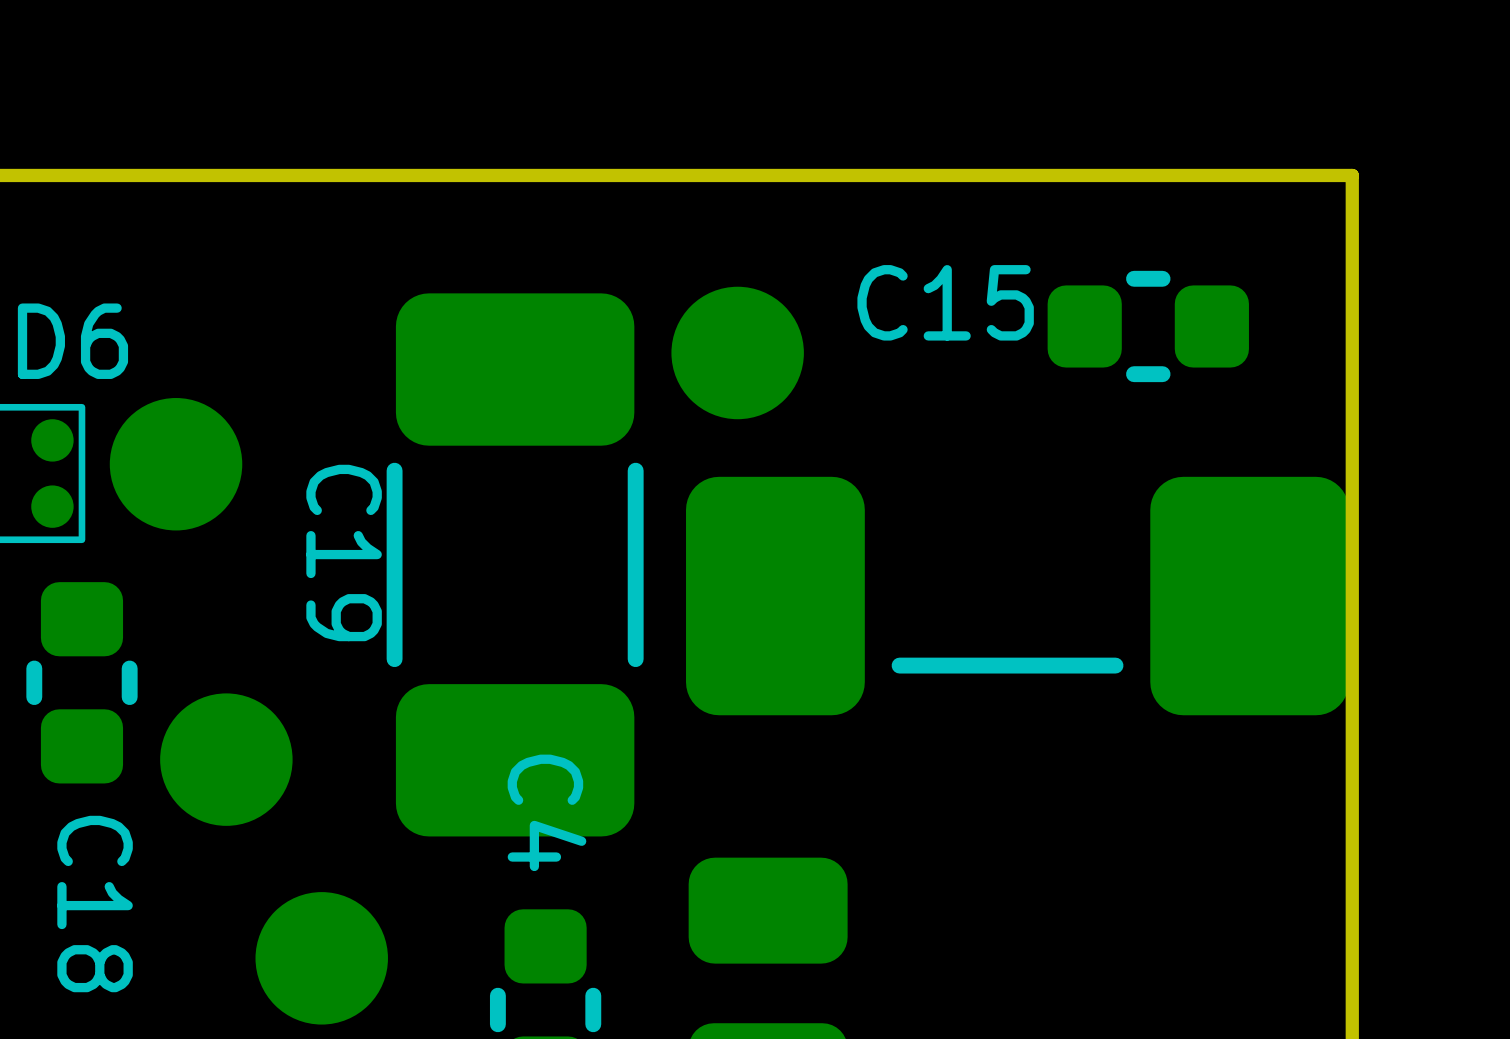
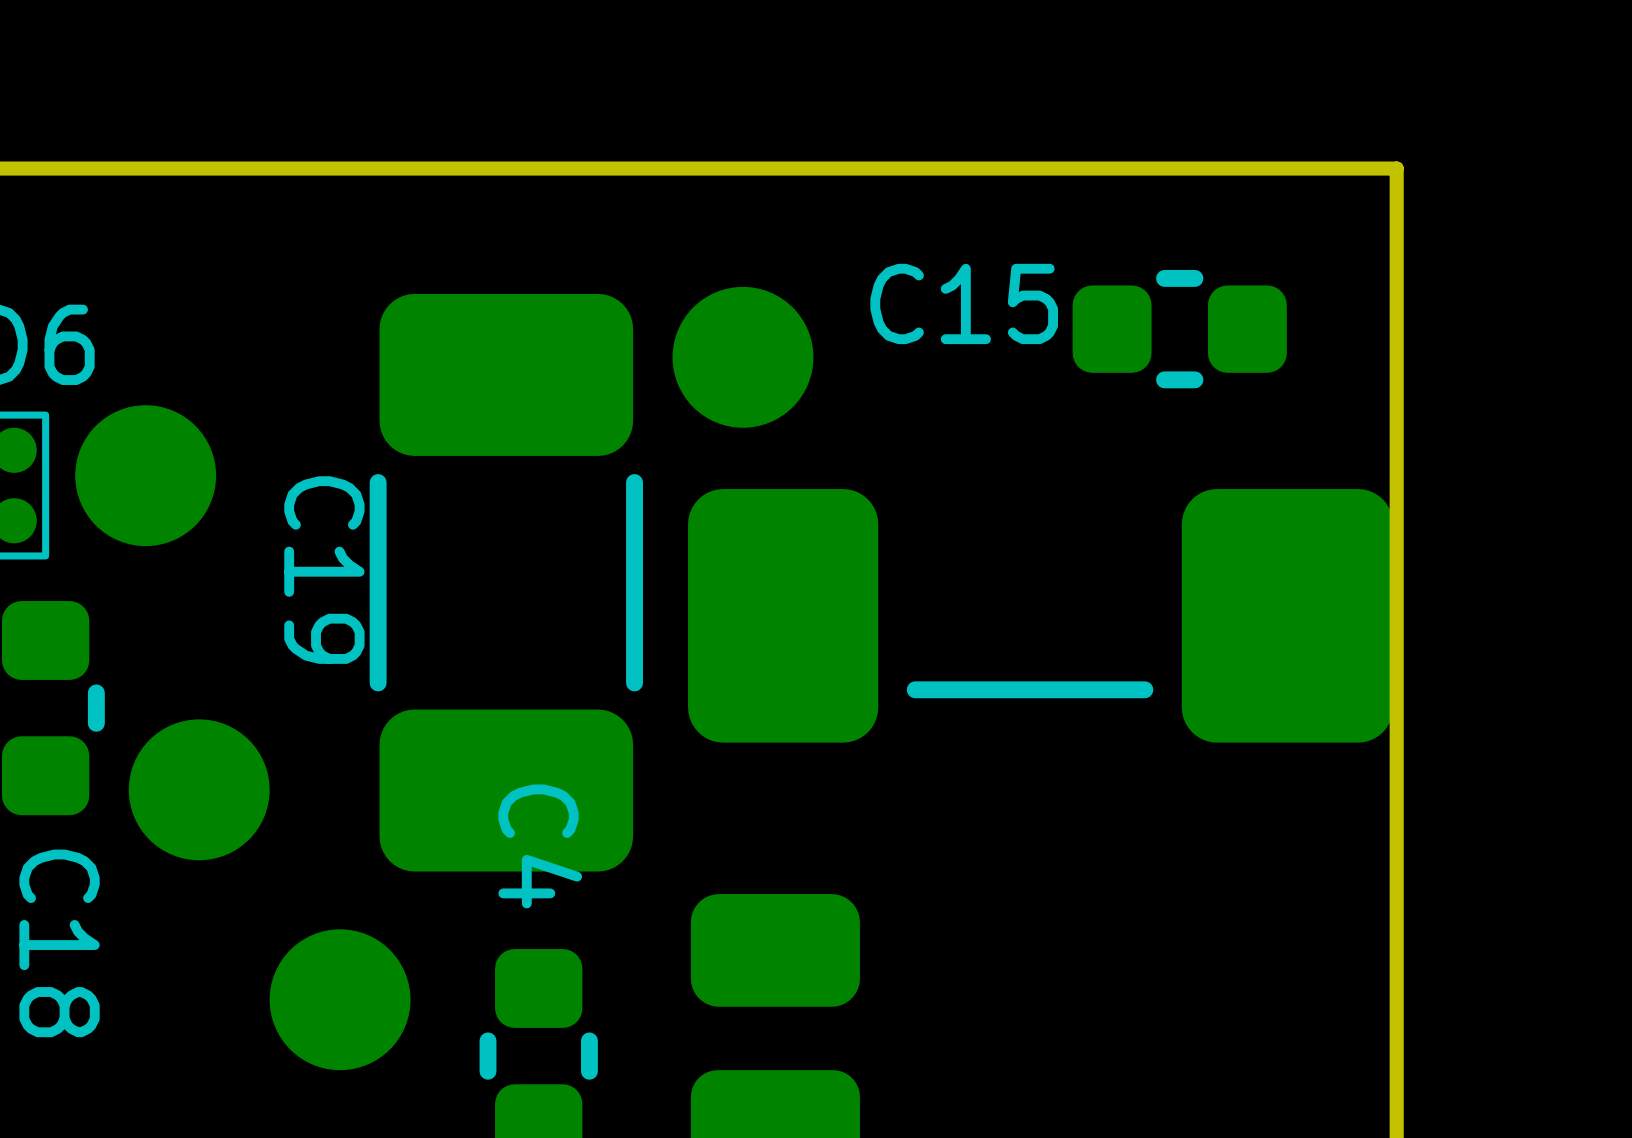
part position: (321, 958) -> (340, 999)

